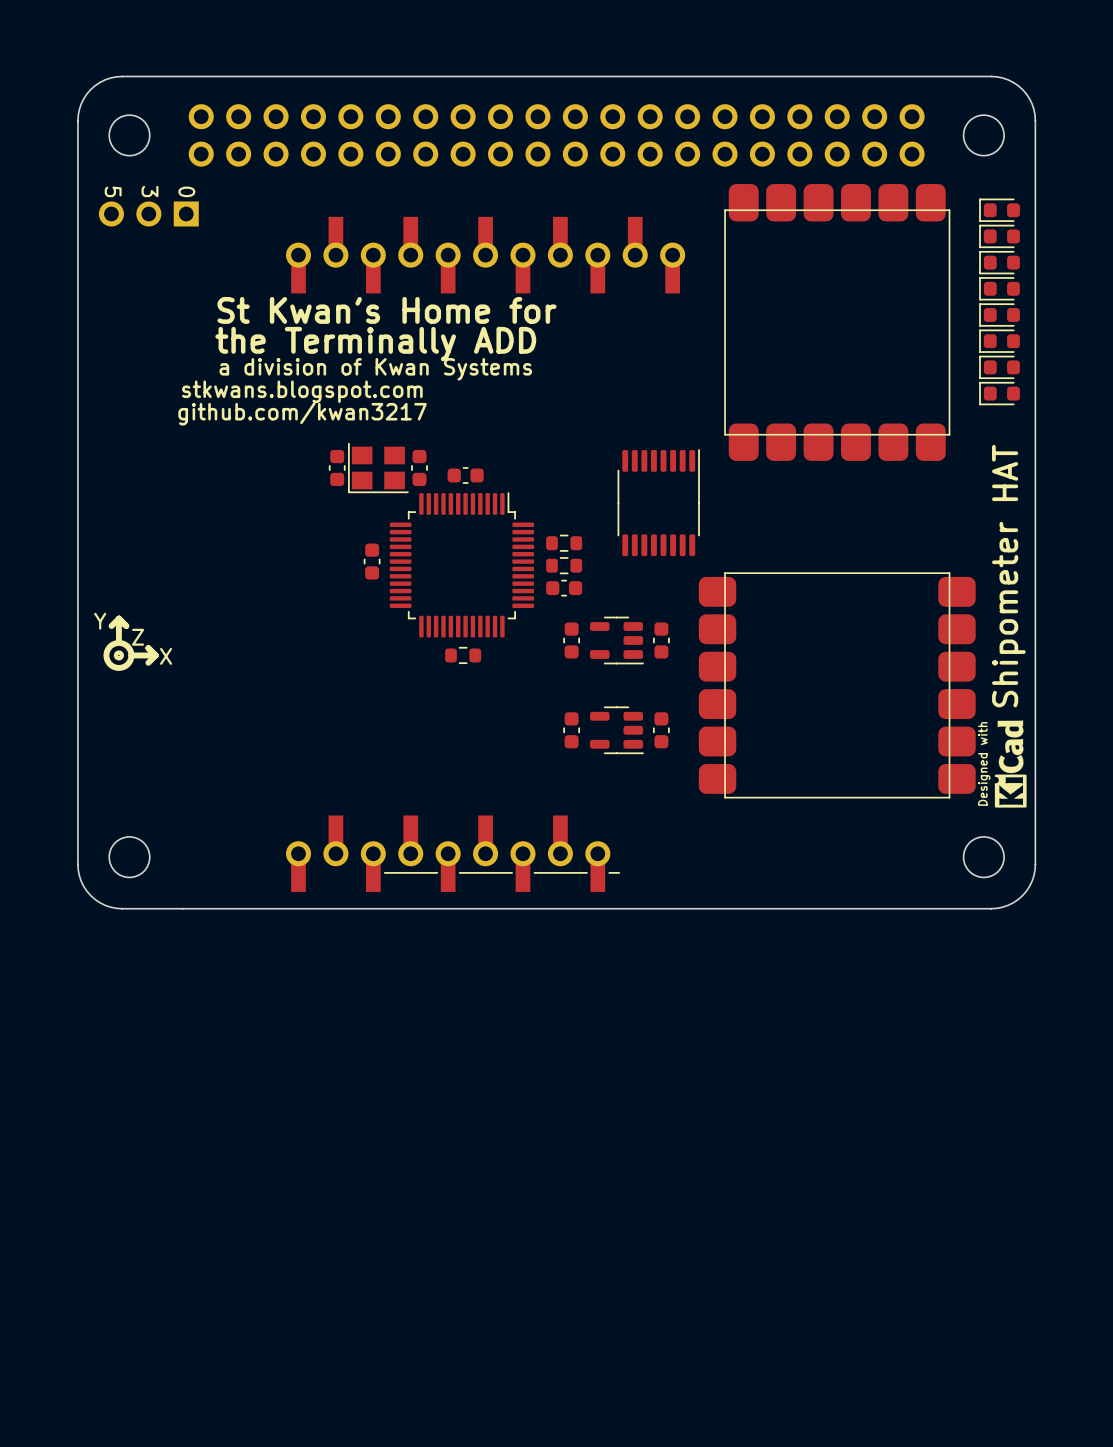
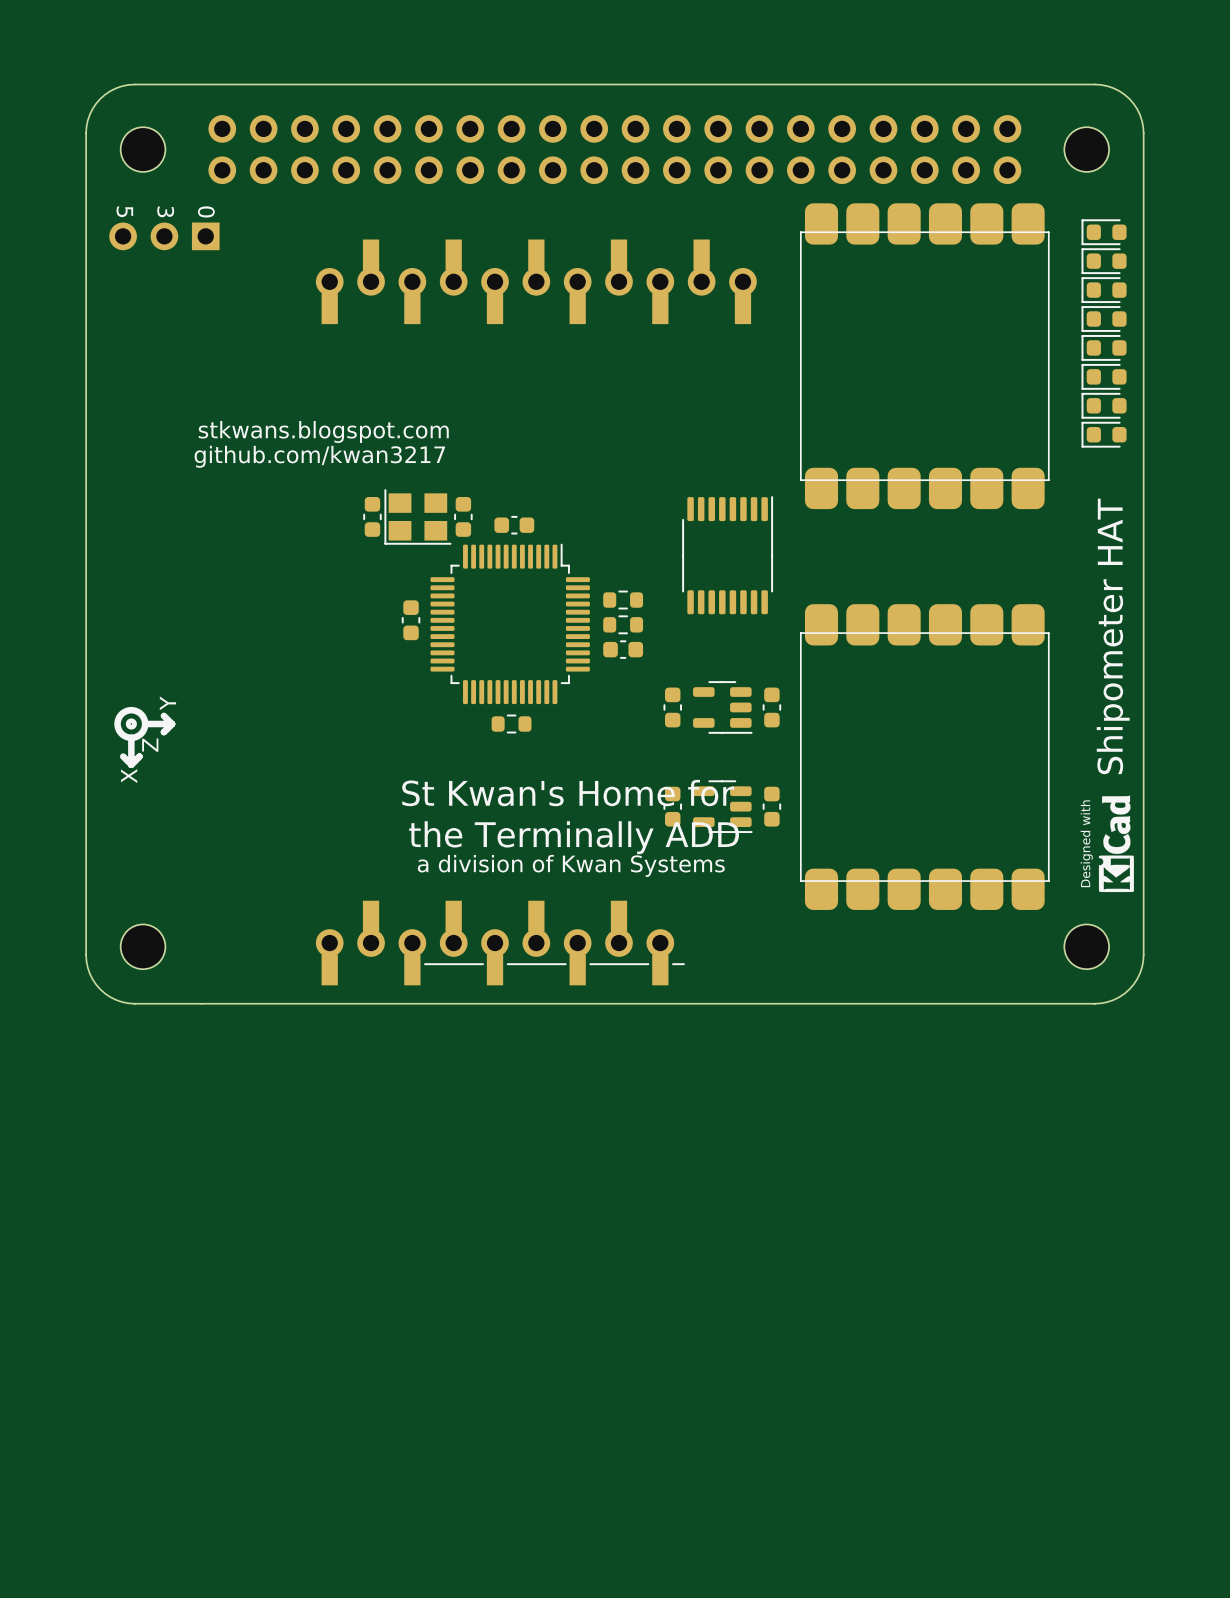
drawing: [178, 296, 557, 426] -> none
drawing: [103, 615, 159, 671] -> none
part footprint: [590, 616, 644, 665] -> [663, 687, 683, 728]
part footprint: [653, 622, 670, 659] -> [693, 681, 753, 734]
drawing: none -> [114, 706, 176, 768]
part: (571, 640) -> none
part: none -> (771, 707)
part rotation: 0° (837, 685) -> 90° clockwise (924, 757)
part footprint: [590, 706, 644, 755] -> [663, 786, 683, 827]
part footprint: [653, 712, 670, 749] -> [693, 780, 753, 834]
part: (571, 730) -> none
part: none -> (771, 806)

